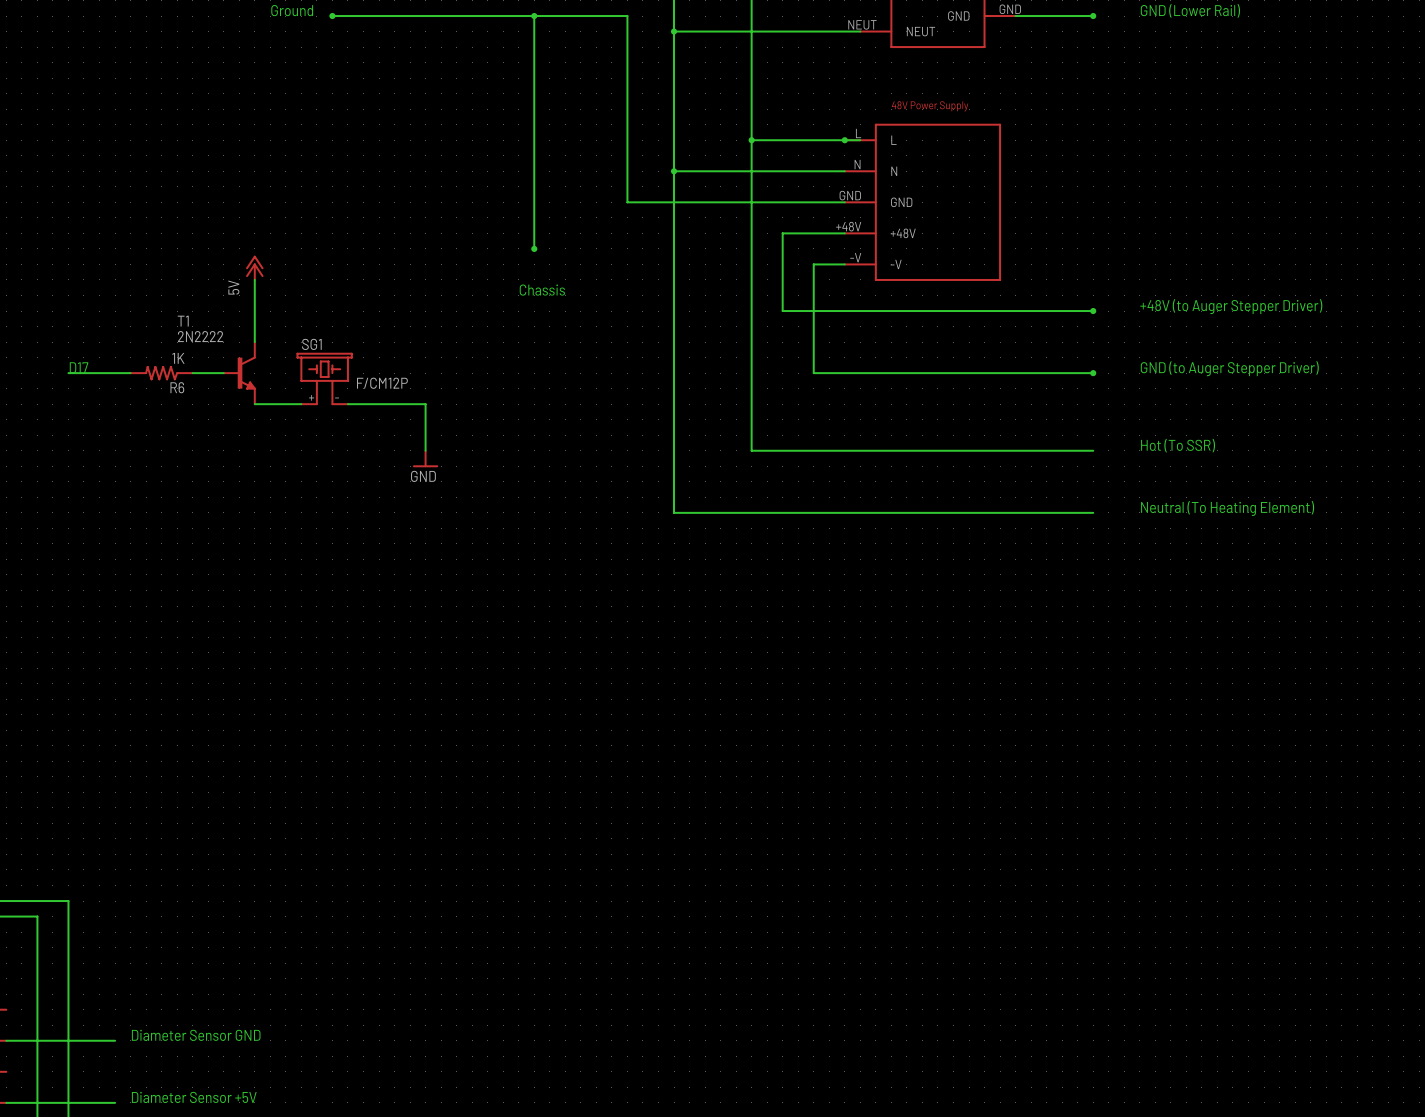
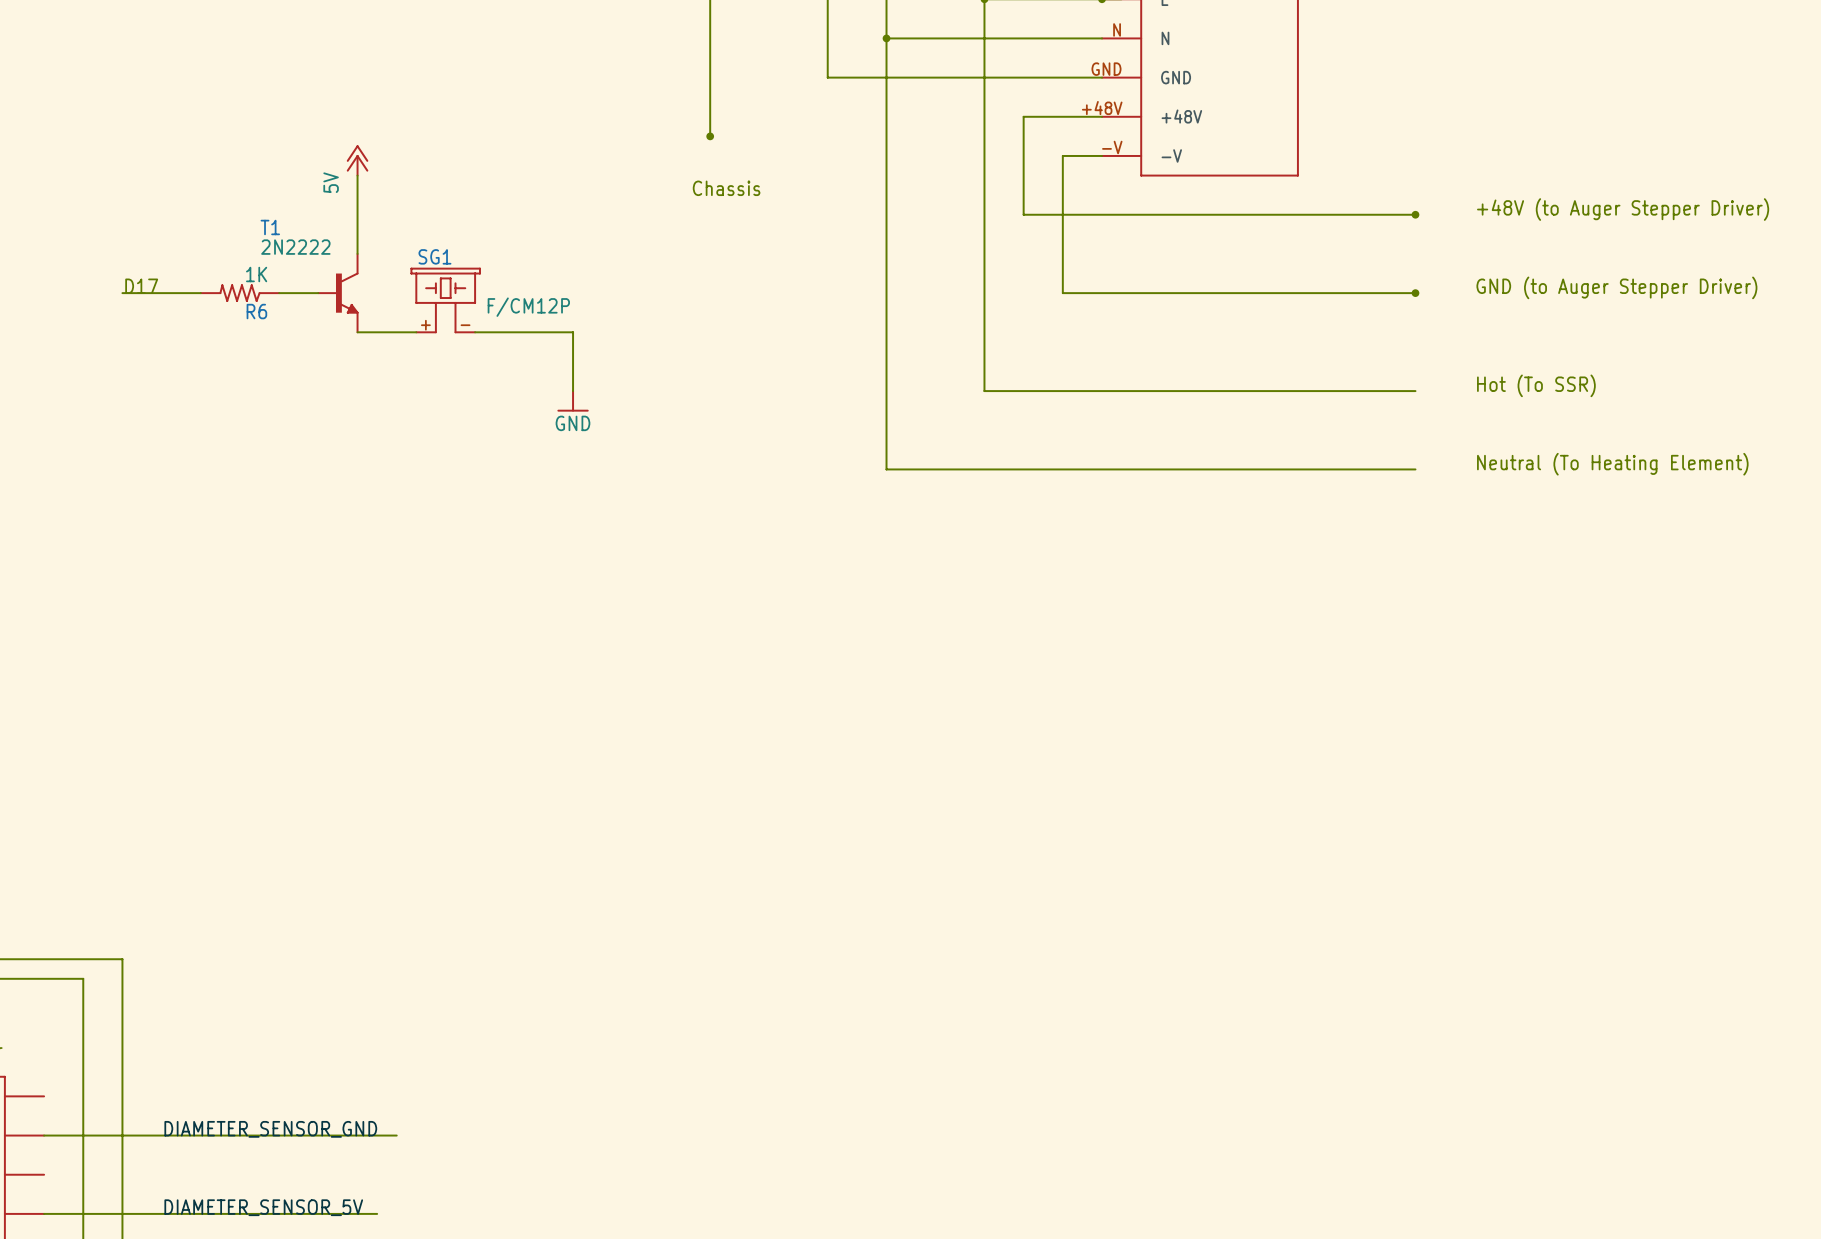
label: none -> DIAMETER_SENSOR_GND (270, 1129)
text: Diameter Sensor GND (196, 1035) -> none
wire: none -> (181, 1135) (396, 1135)
label: none -> DIAMETER_SENSOR_5V (263, 1207)
text: Diameter Sensor +5V (194, 1097) -> none
wire: none -> (181, 1213) (377, 1213)

